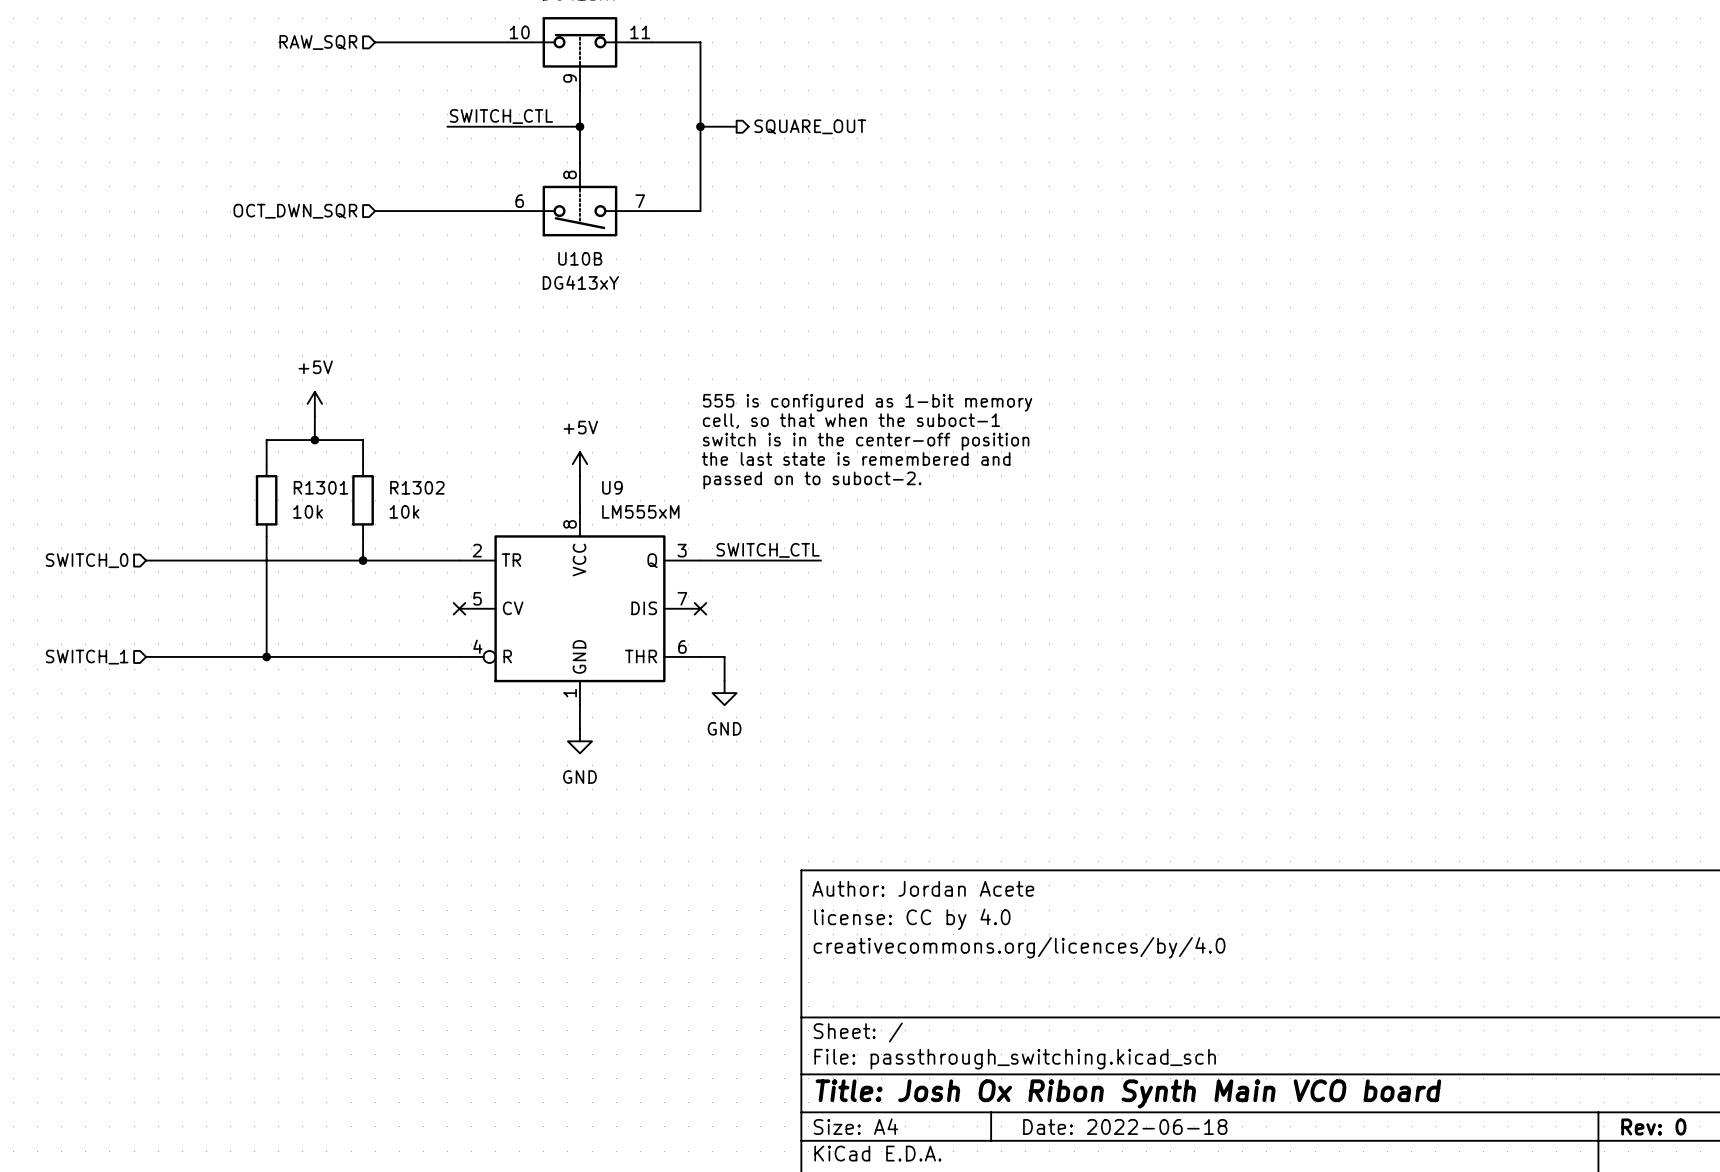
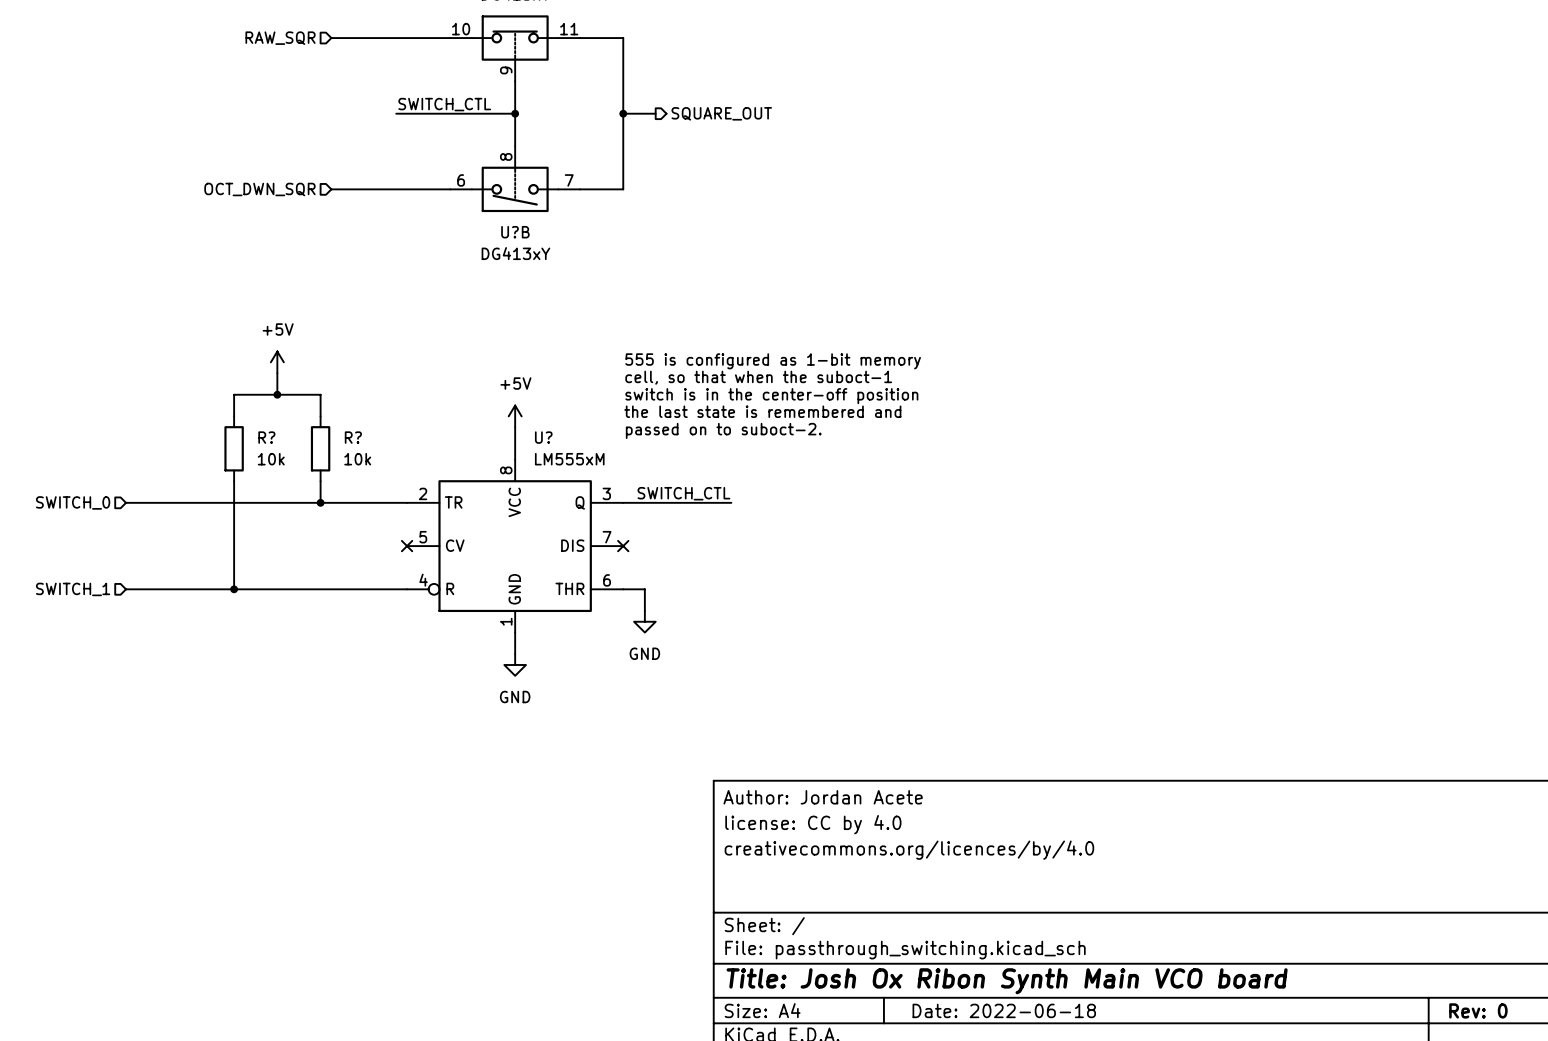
U10B name: U10B (580, 258) -> U?B (515, 232)
R1301 name: R1301 (320, 487) -> R? (266, 437)
R1302 name: R1302 (417, 487) -> R? (353, 437)
U9 name: U9 (612, 487) -> U? (543, 437)

